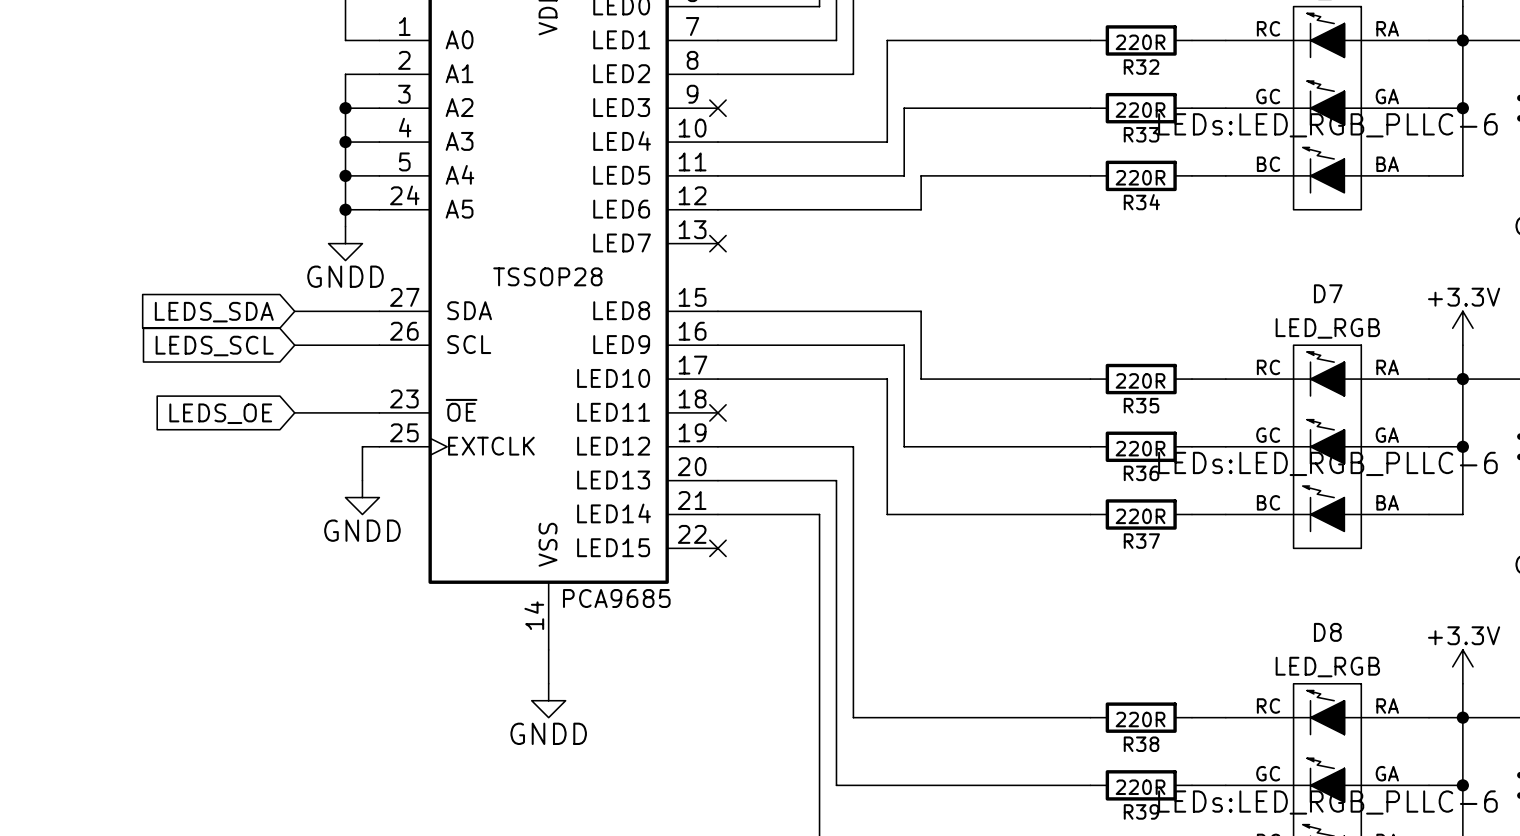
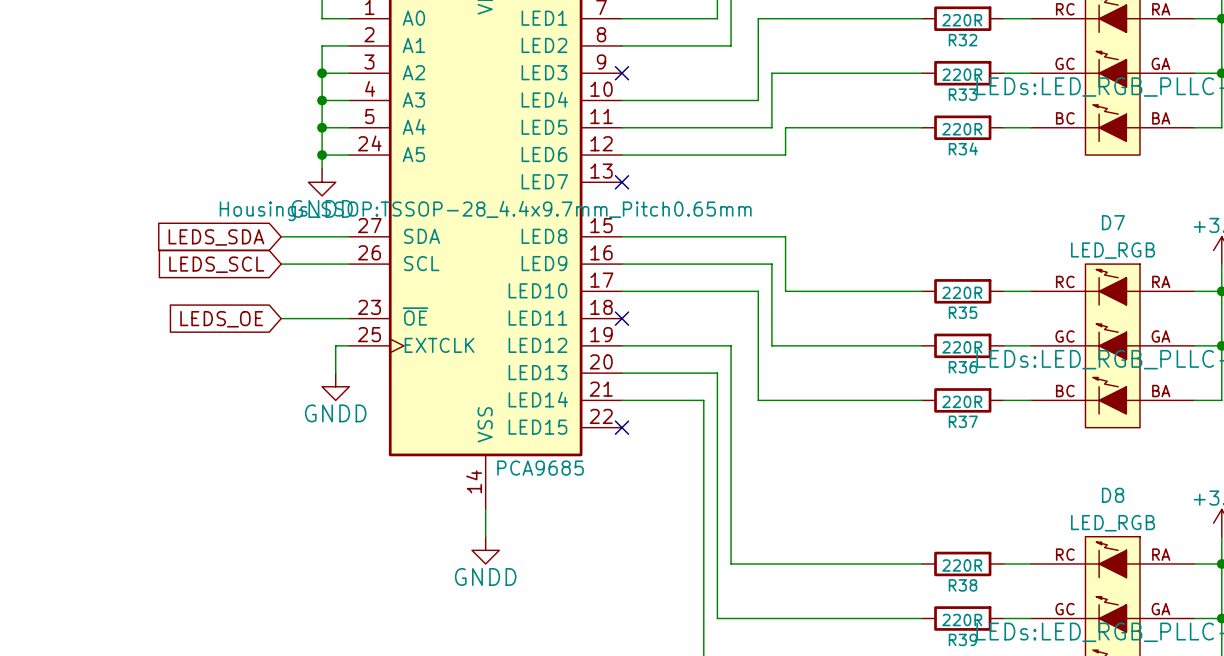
part text: TSSOP28 (547, 276) -> Housings_SSOP:TSSOP-28_4.4x9.7mm_Pitch0.65mm (485, 210)

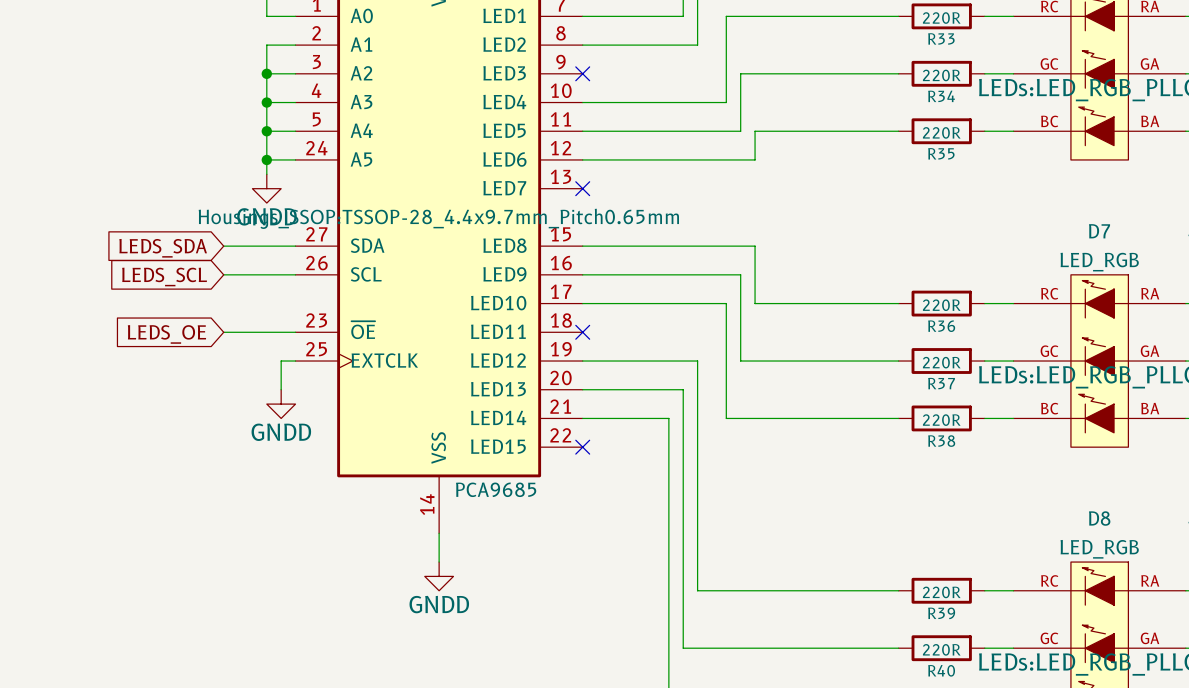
R32 name: R32 (963, 40) -> R33 (941, 38)
R33 name: R33 (963, 94) -> R34 (941, 96)
R34 name: R34 (963, 148) -> R35 (941, 153)
R35 name: R35 (963, 312) -> R36 (941, 326)
R36 name: R36 (963, 367) -> R37 (941, 383)
R37 name: R37 (963, 421) -> R38 (941, 441)
R38 name: R38 (963, 585) -> R39 (941, 613)
R39 name: R39 (963, 639) -> R40 (941, 670)

